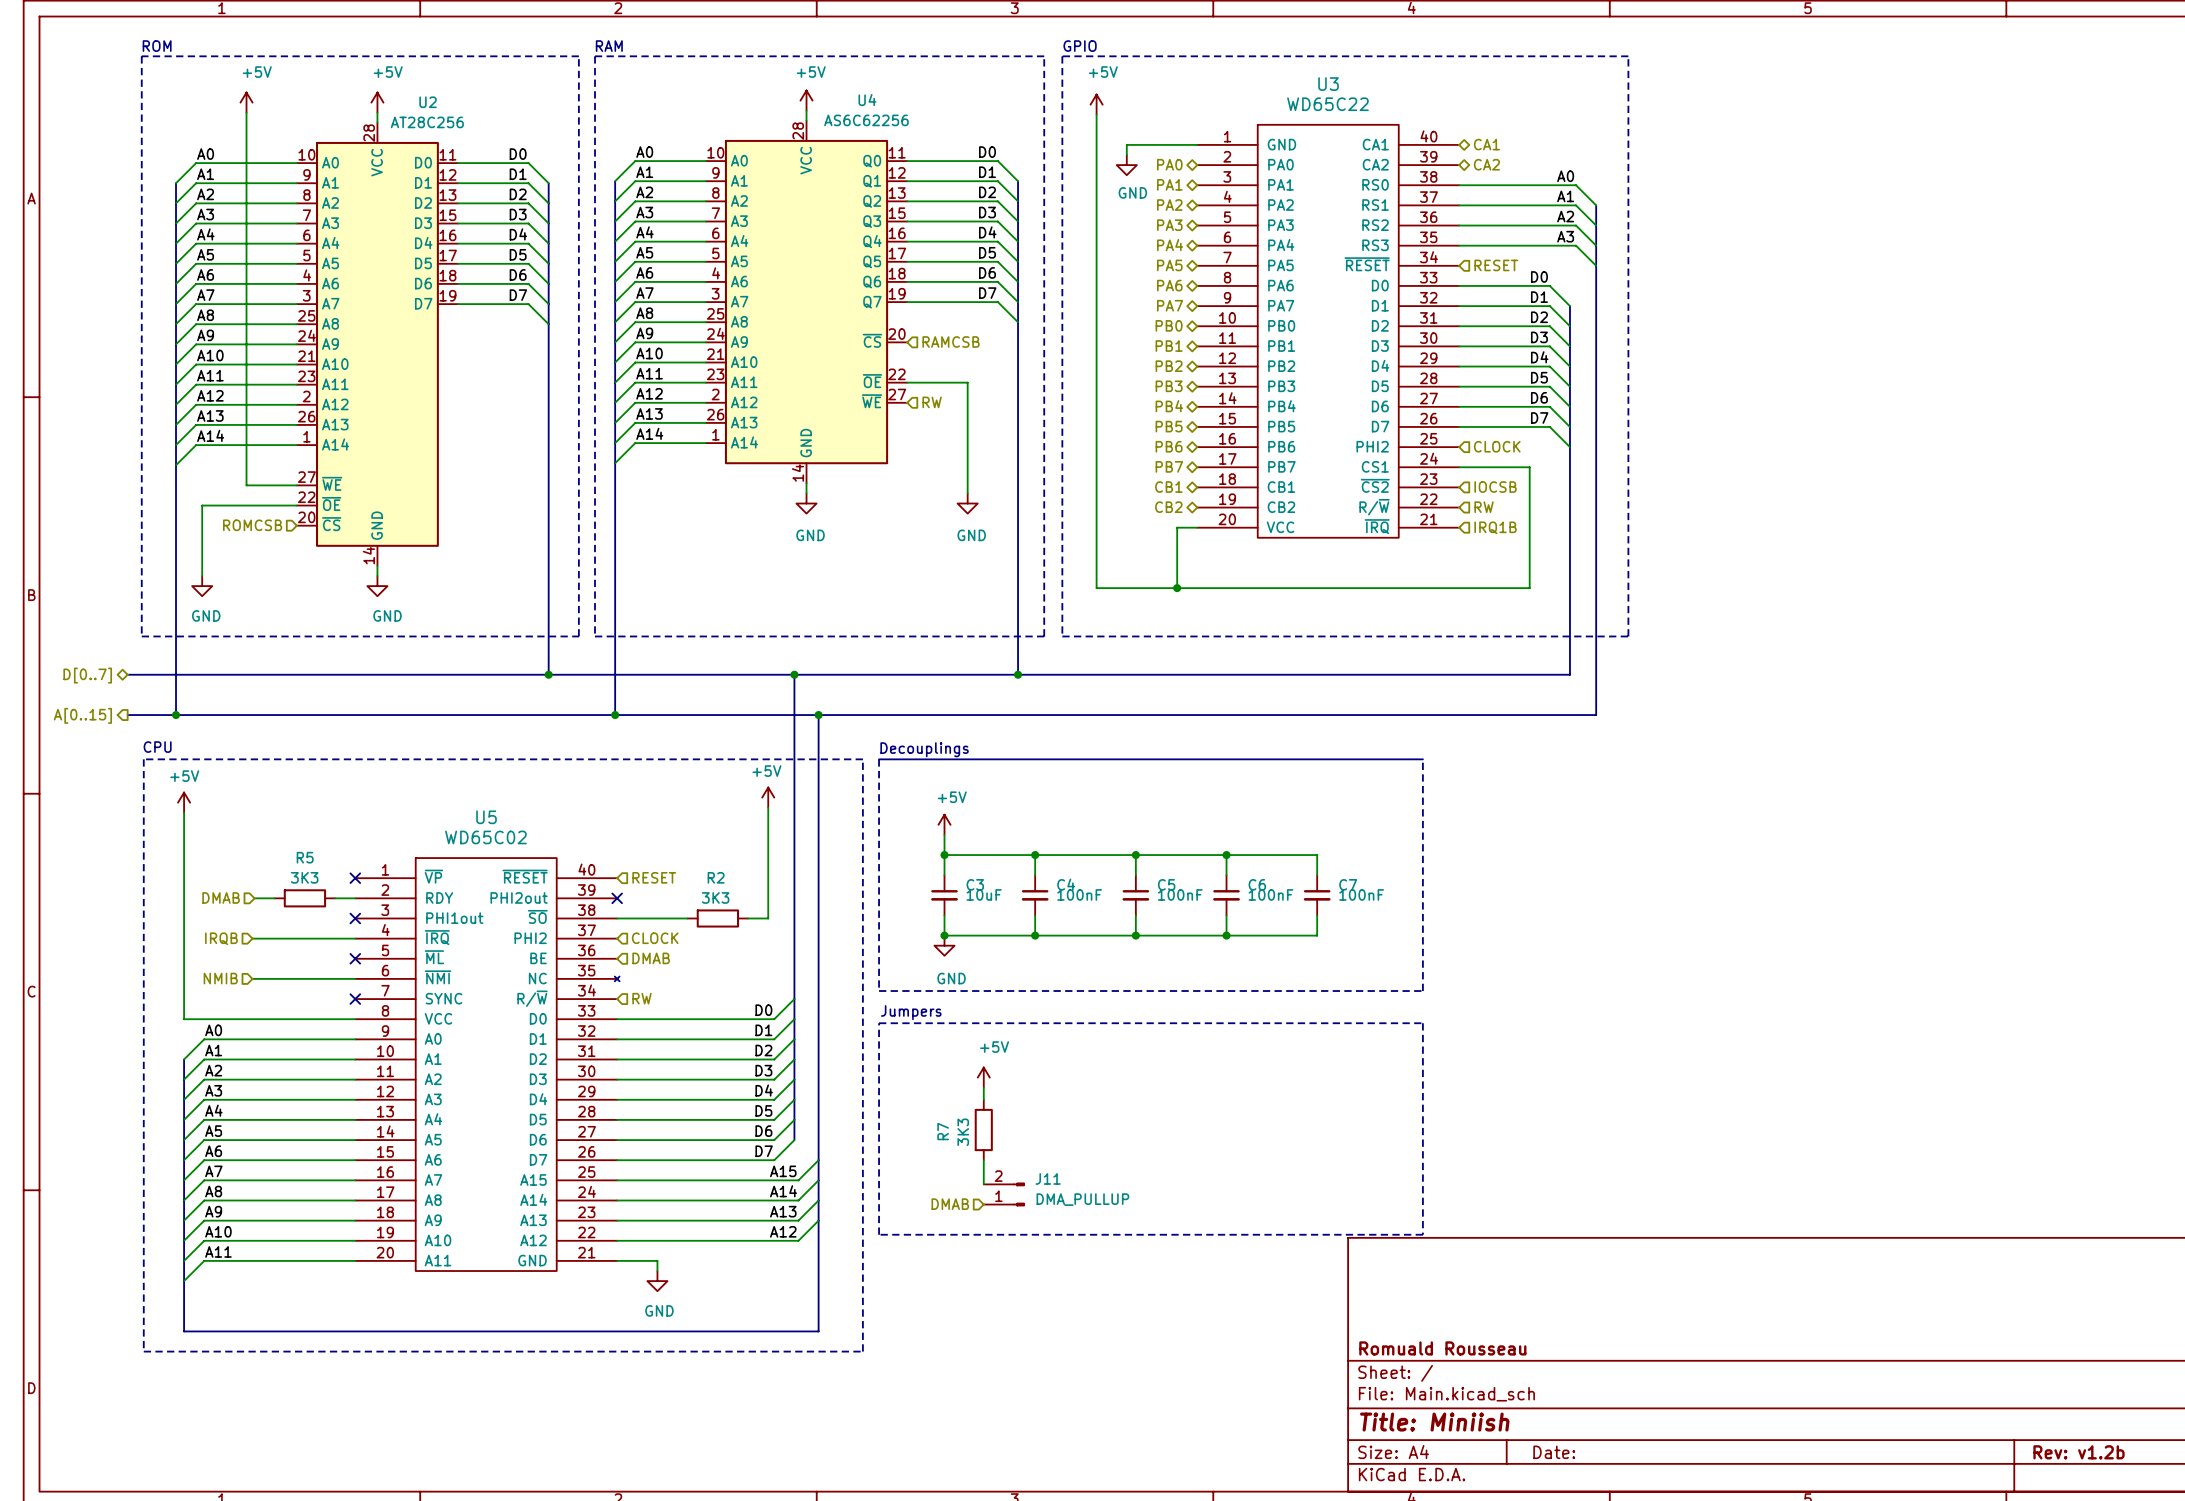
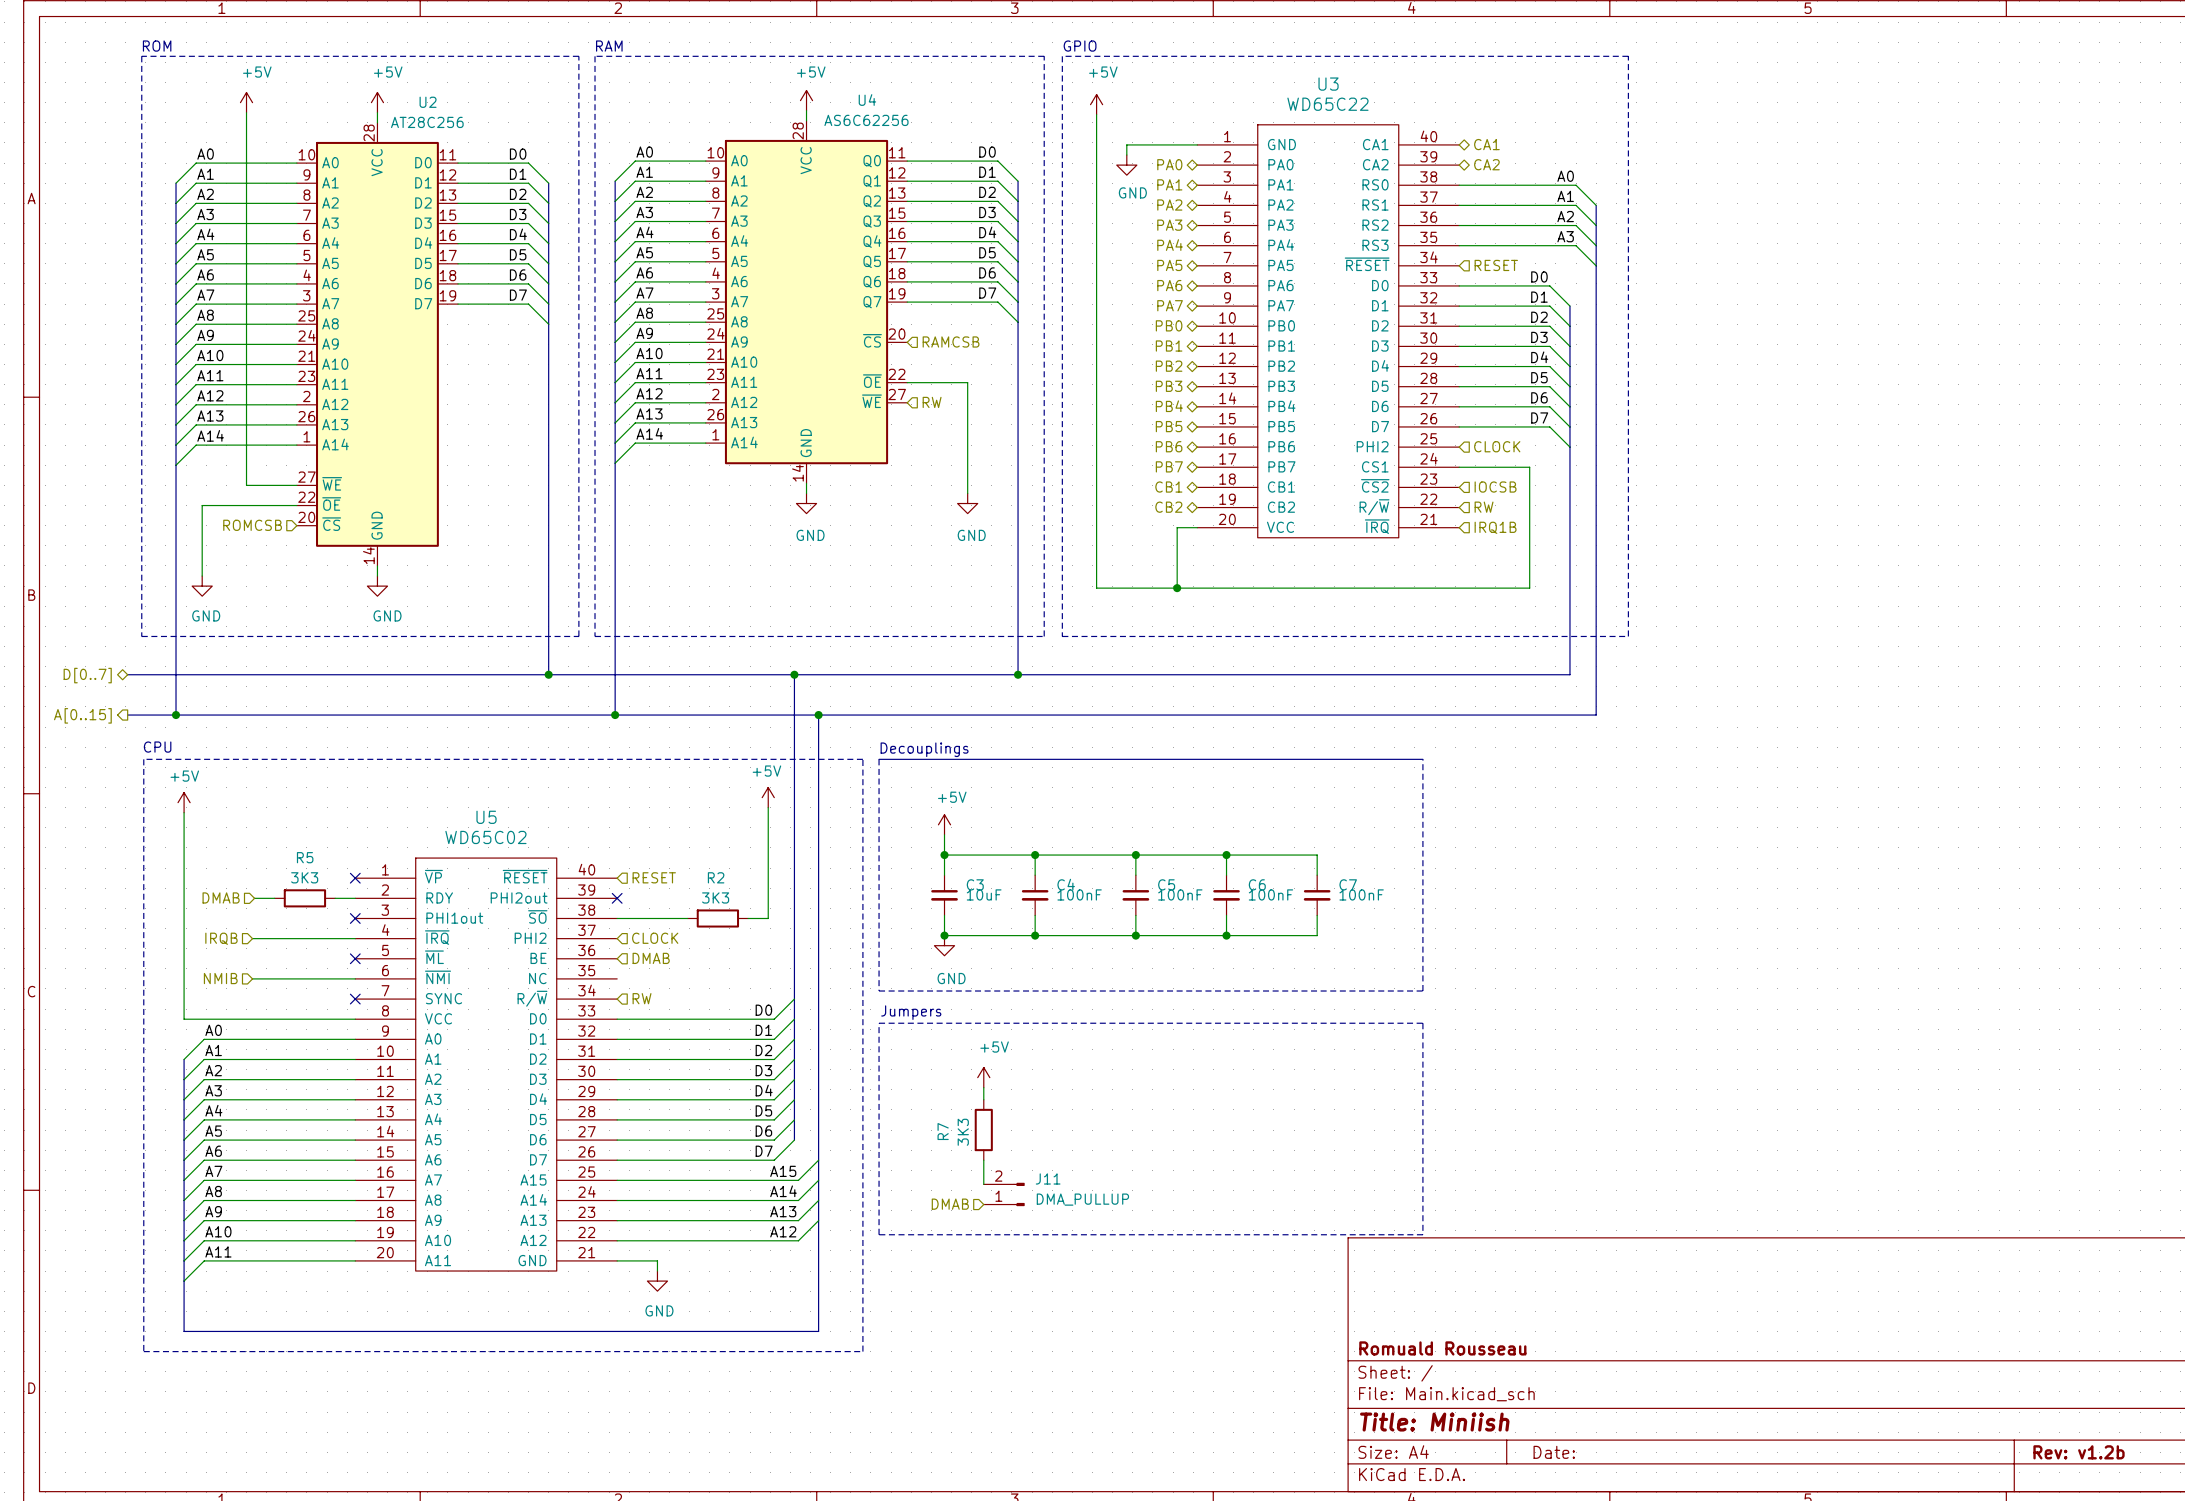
U5 symbol: [355, 858, 620, 1272] -> [355, 858, 618, 1272]

